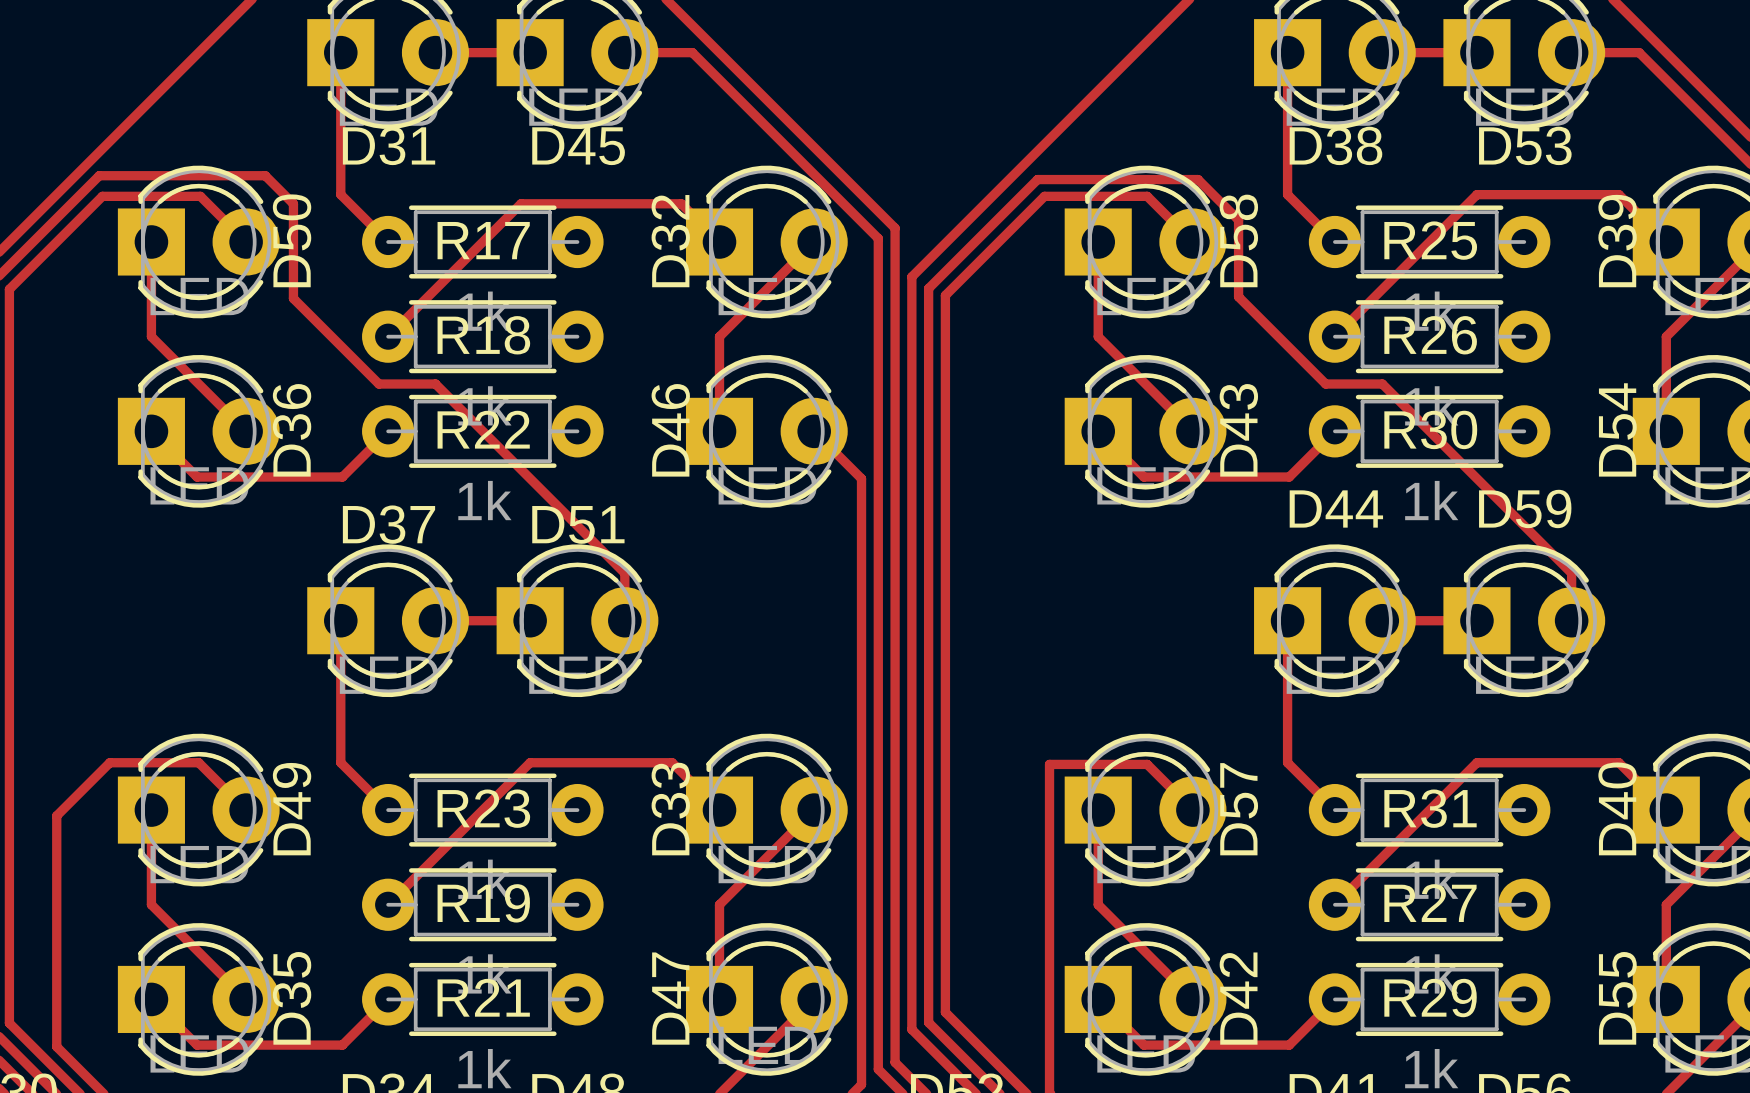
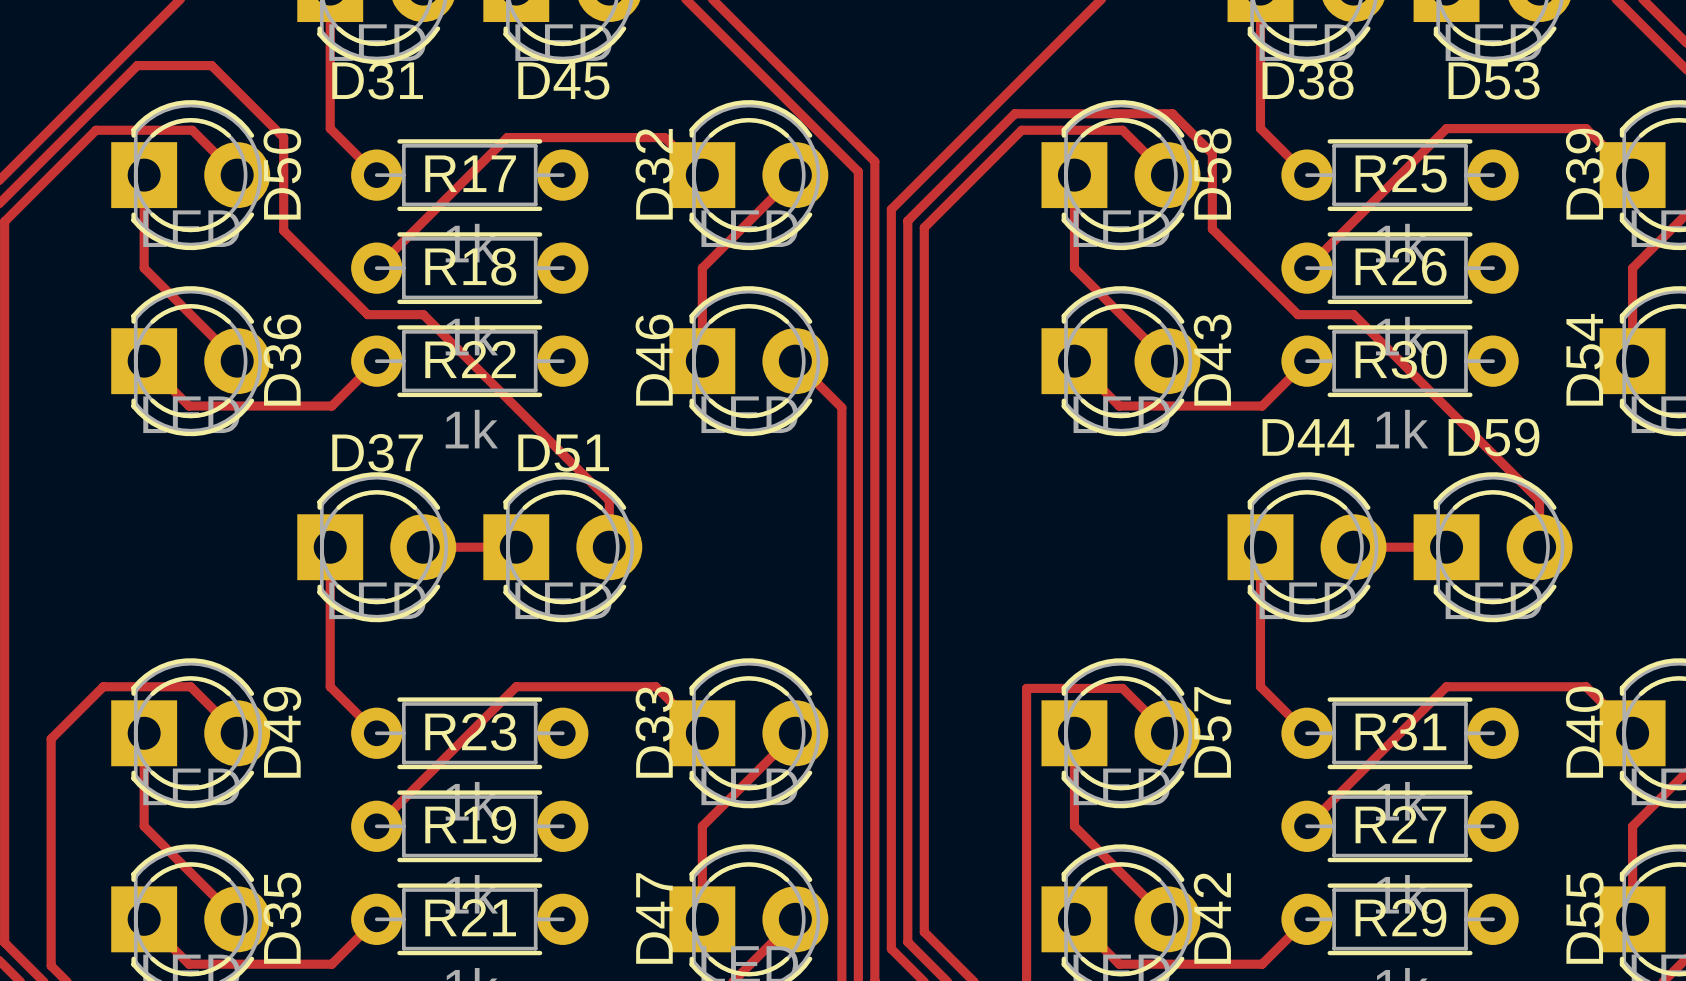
top track: (99, 175) (265, 175) -> (92, 109) (137, 65) (211, 65) (256, 109)

